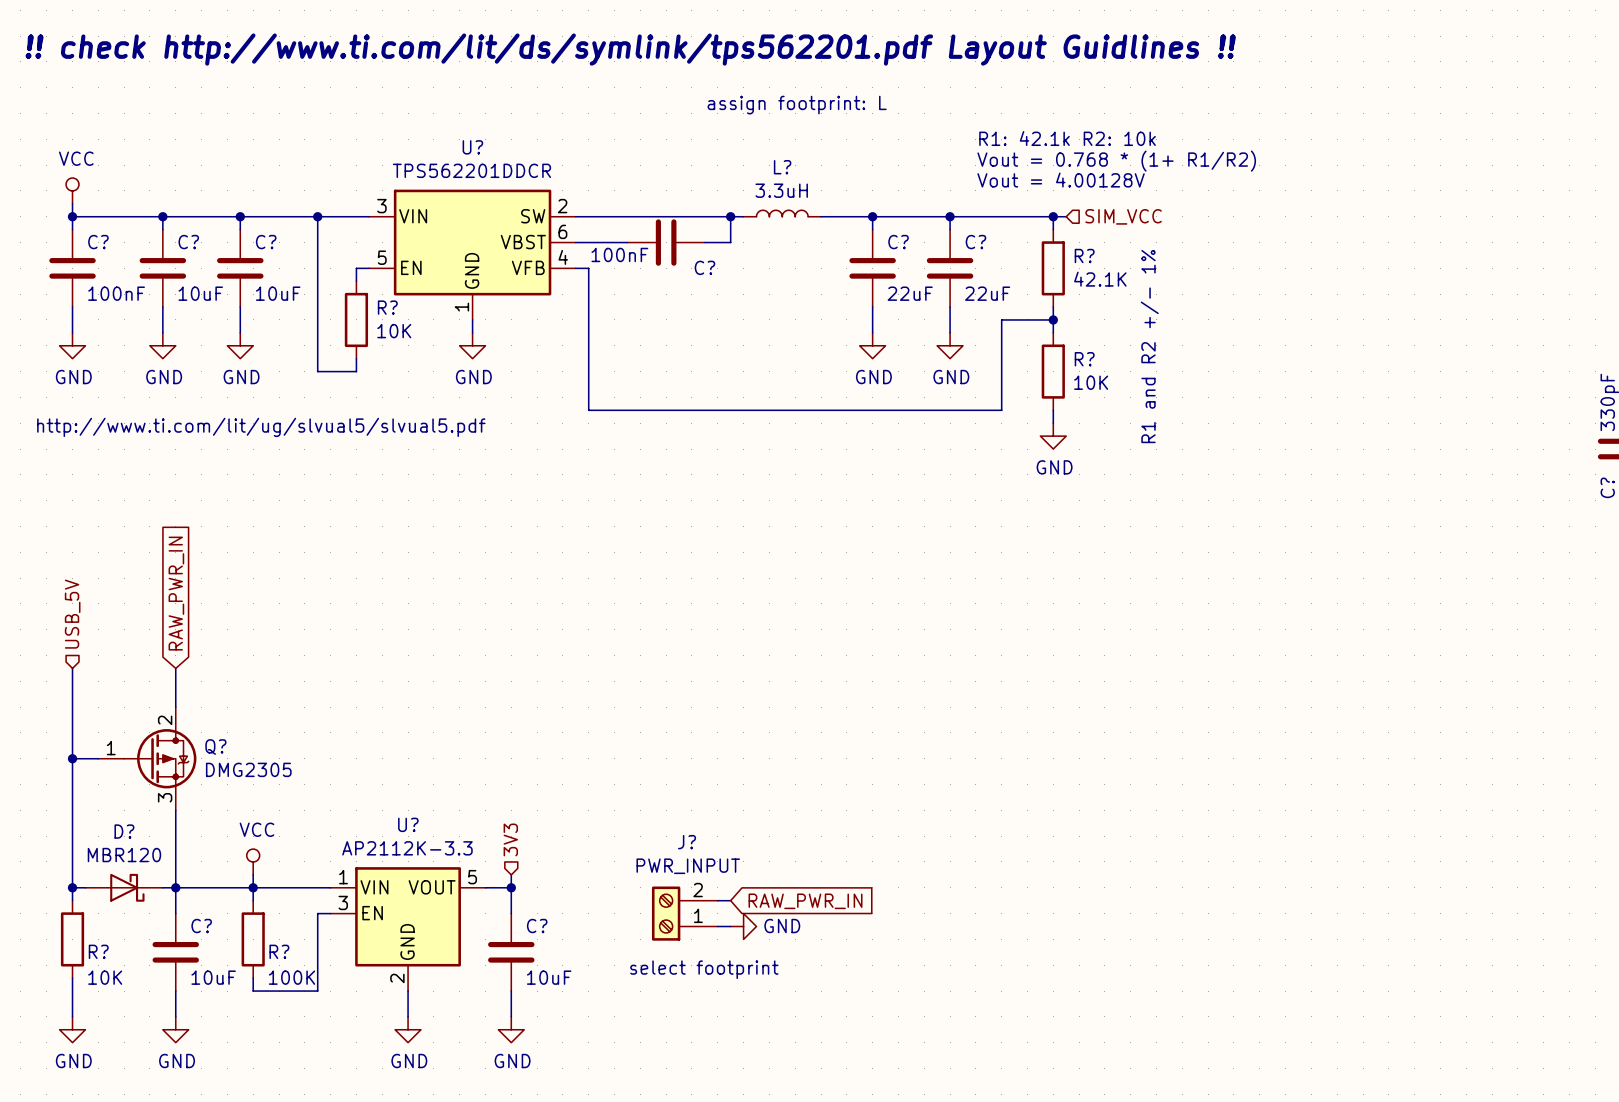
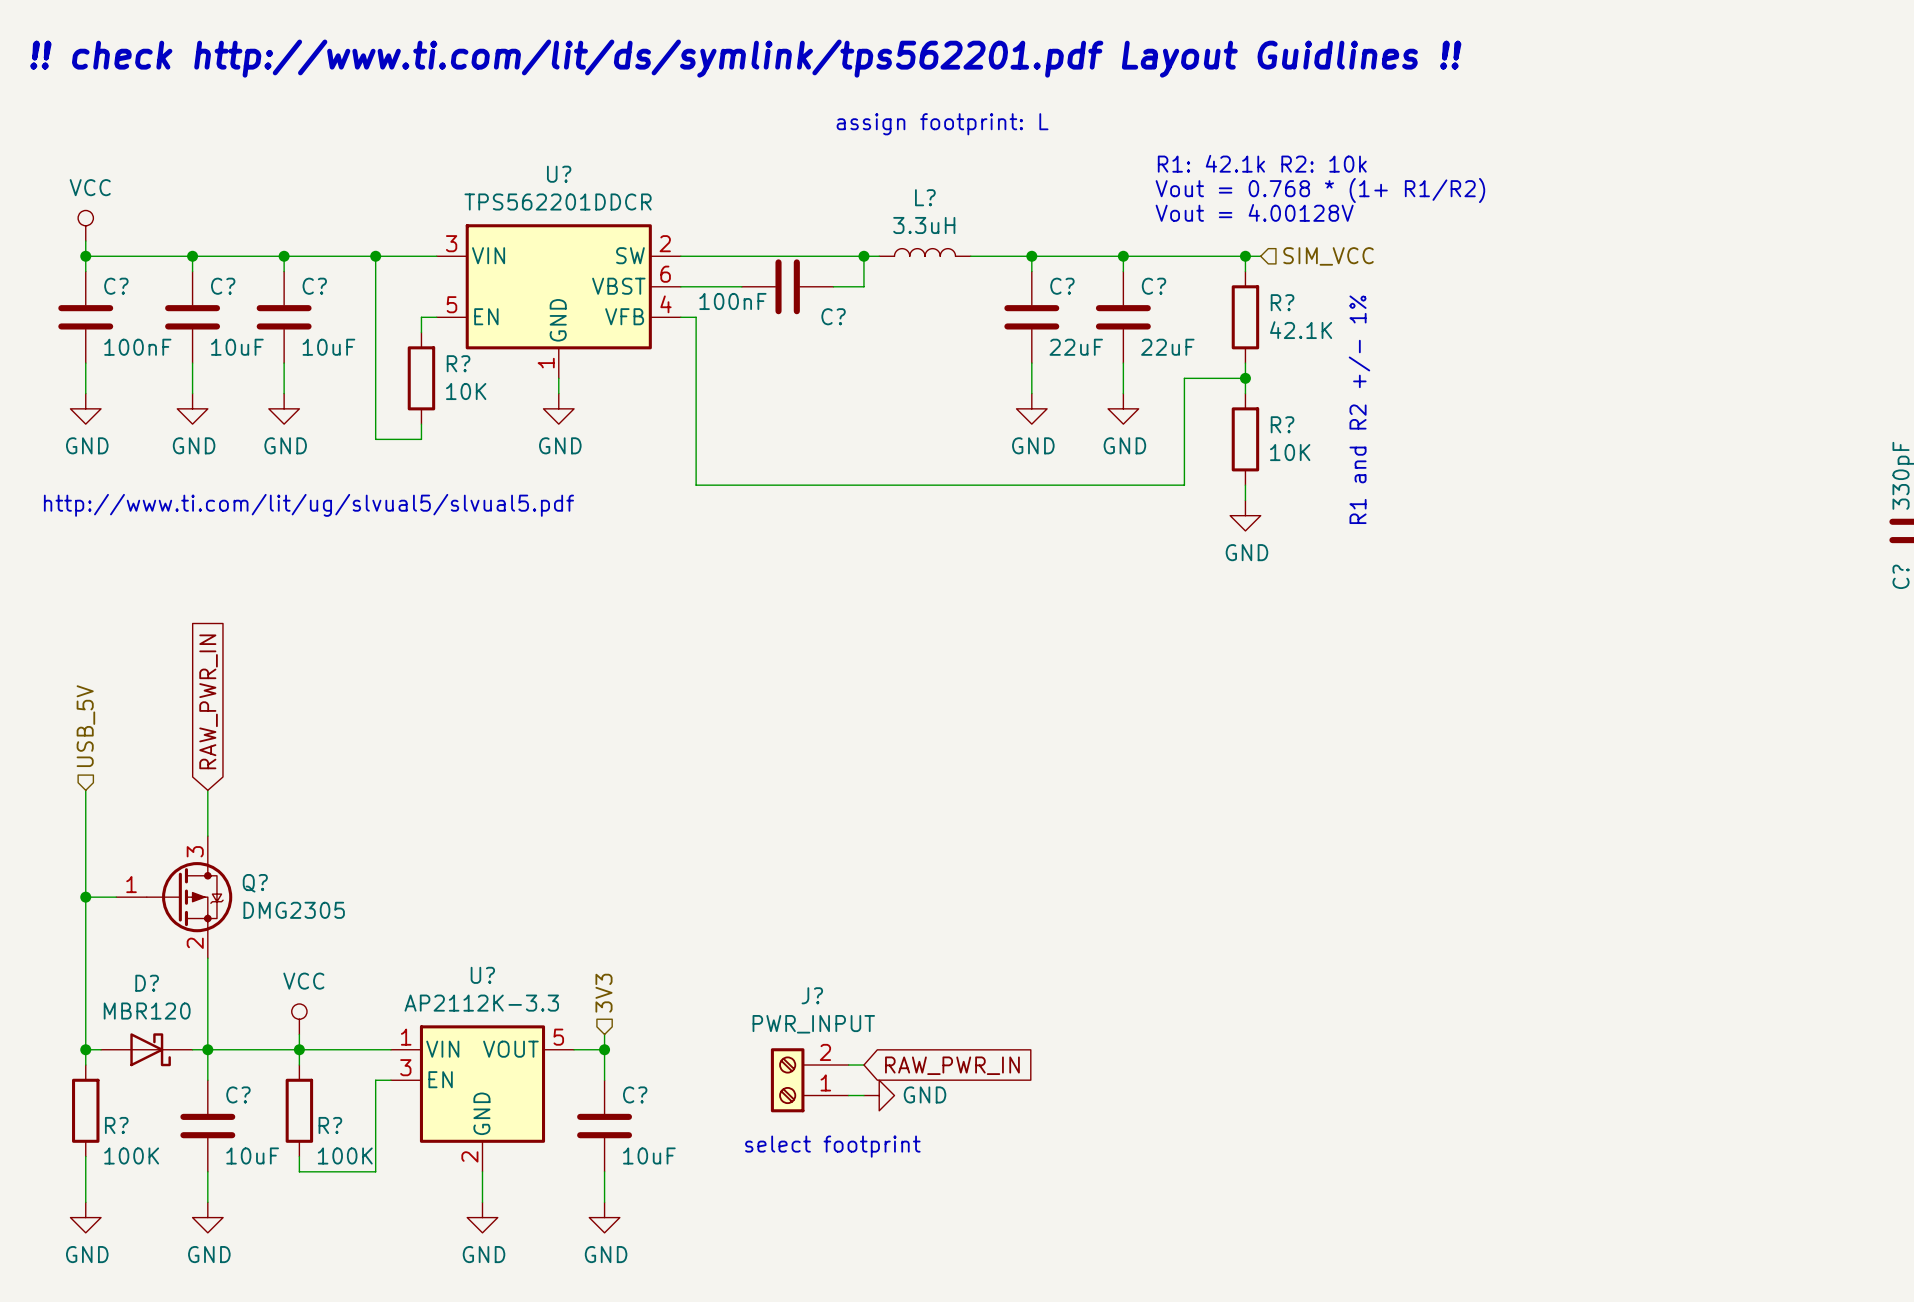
Q? pin number: 2 (165, 720) -> 3 (195, 851)
Q? pin number: 3 (165, 797) -> 2 (195, 943)
R? value: 10K (105, 977) -> 100K (131, 1155)

